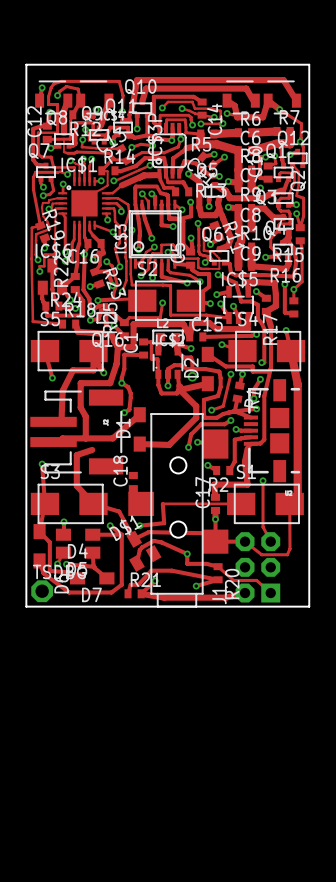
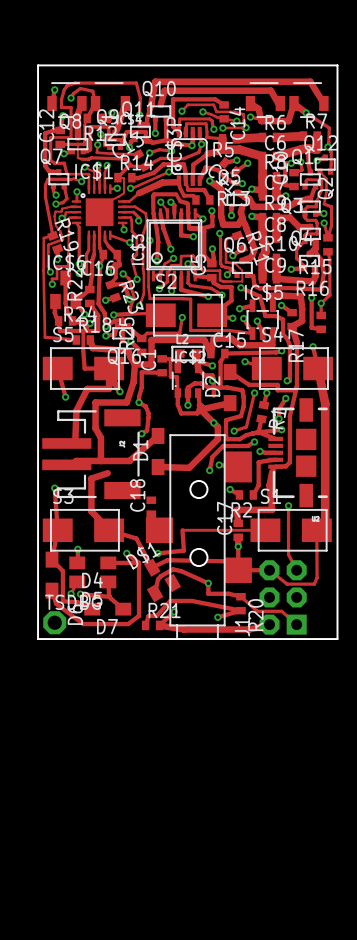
track: none -> (90, 323) (83, 331) (84, 368) (109, 368)
track: none -> (224, 354) (220, 361) (220, 387)
via: none -> (212, 380)
via: (192, 376) -> none
via: none -> (213, 422)

